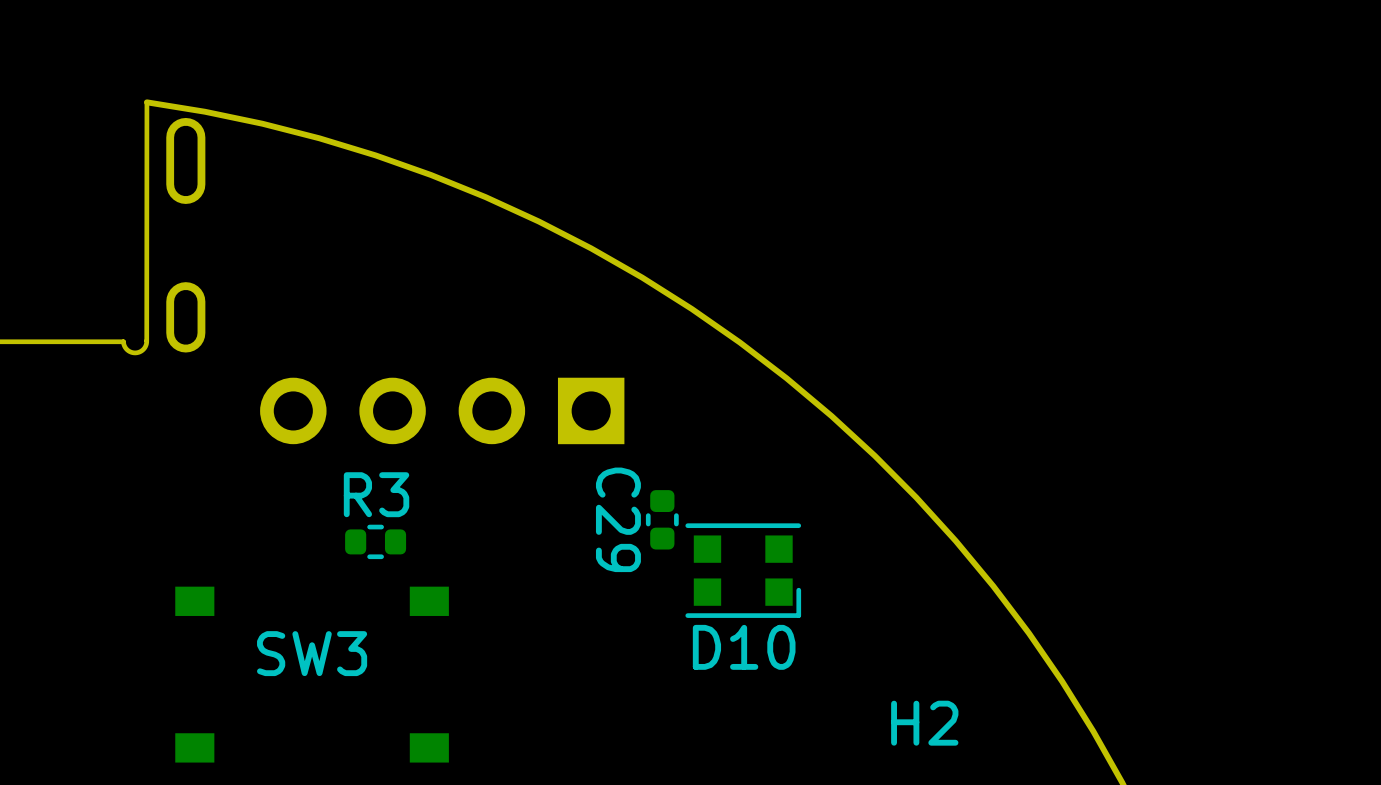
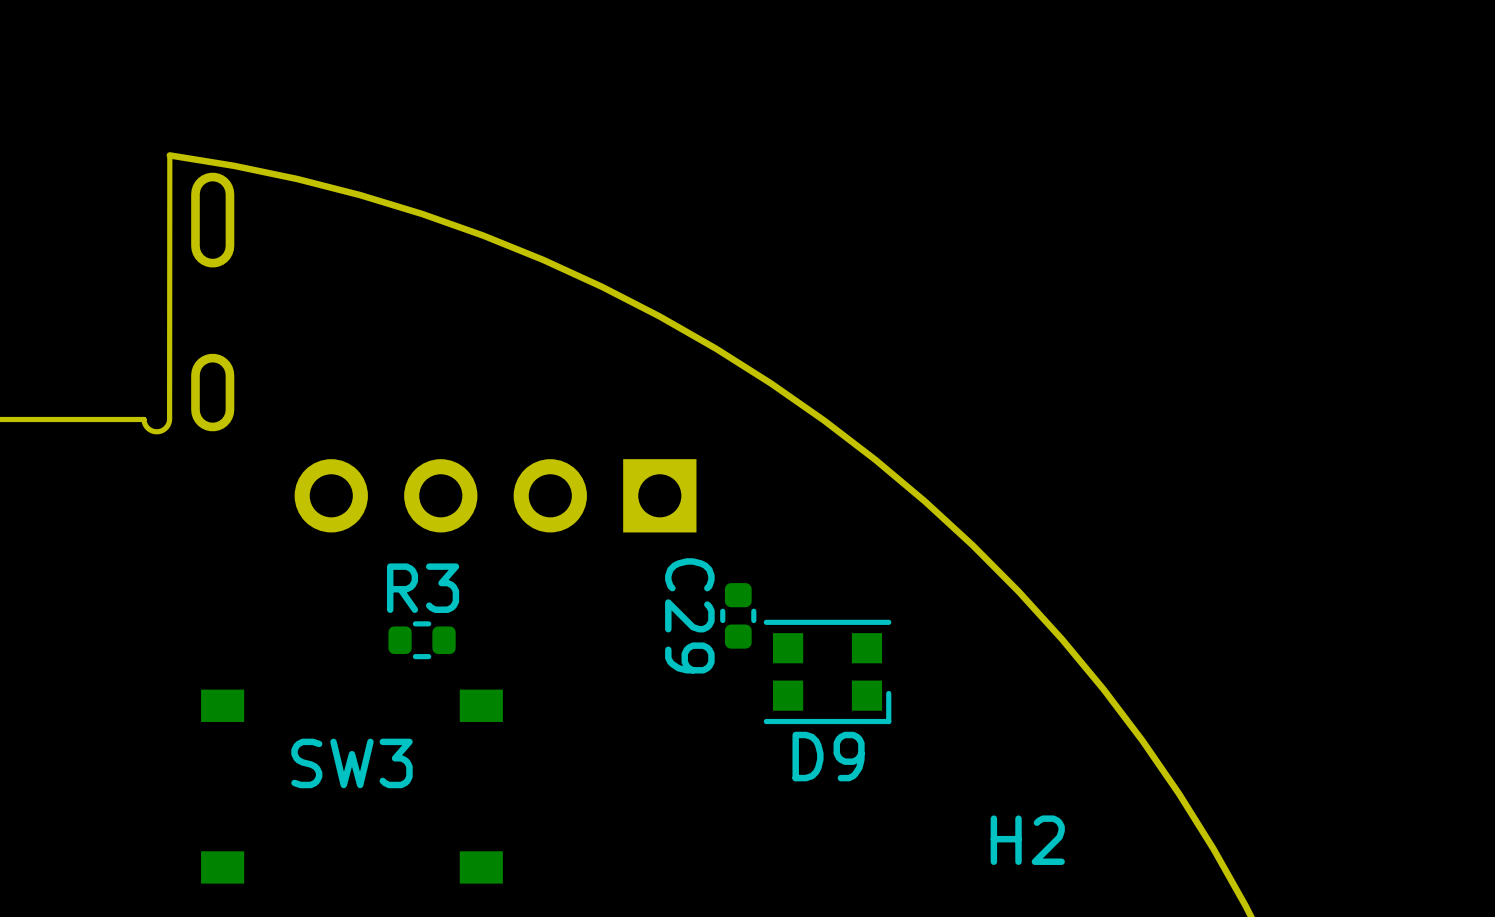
D10 name: D10 (744, 647) -> D9 (828, 756)

